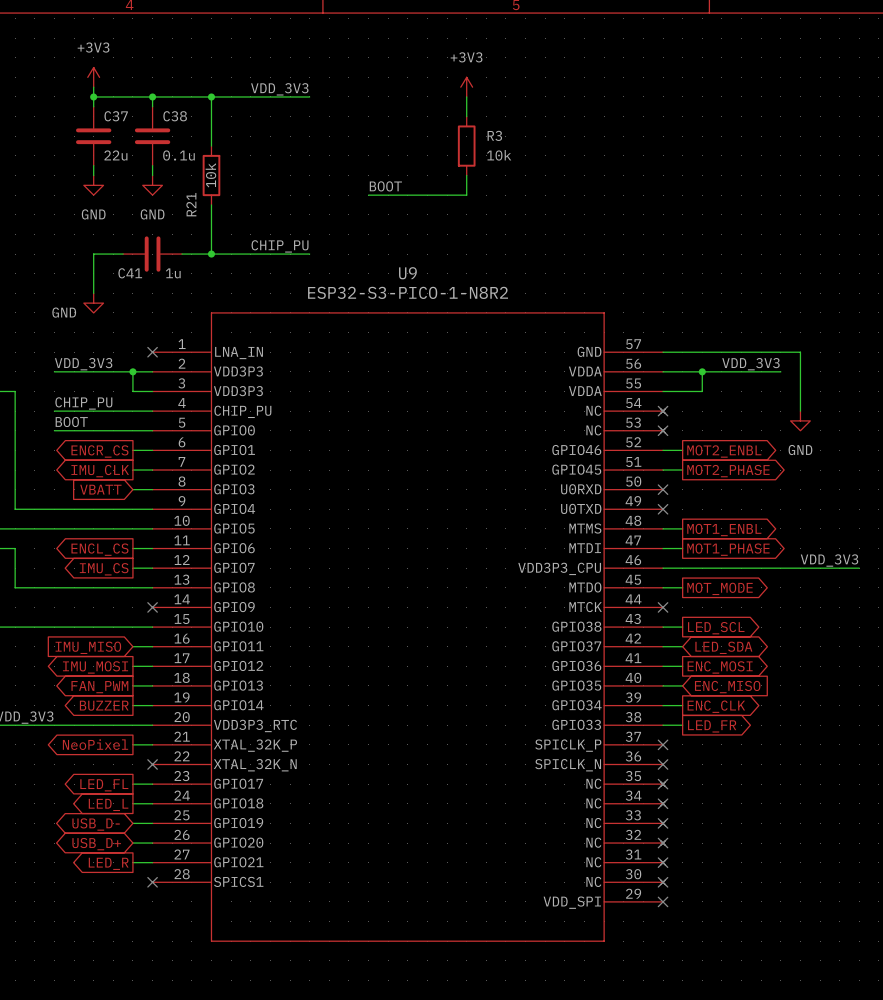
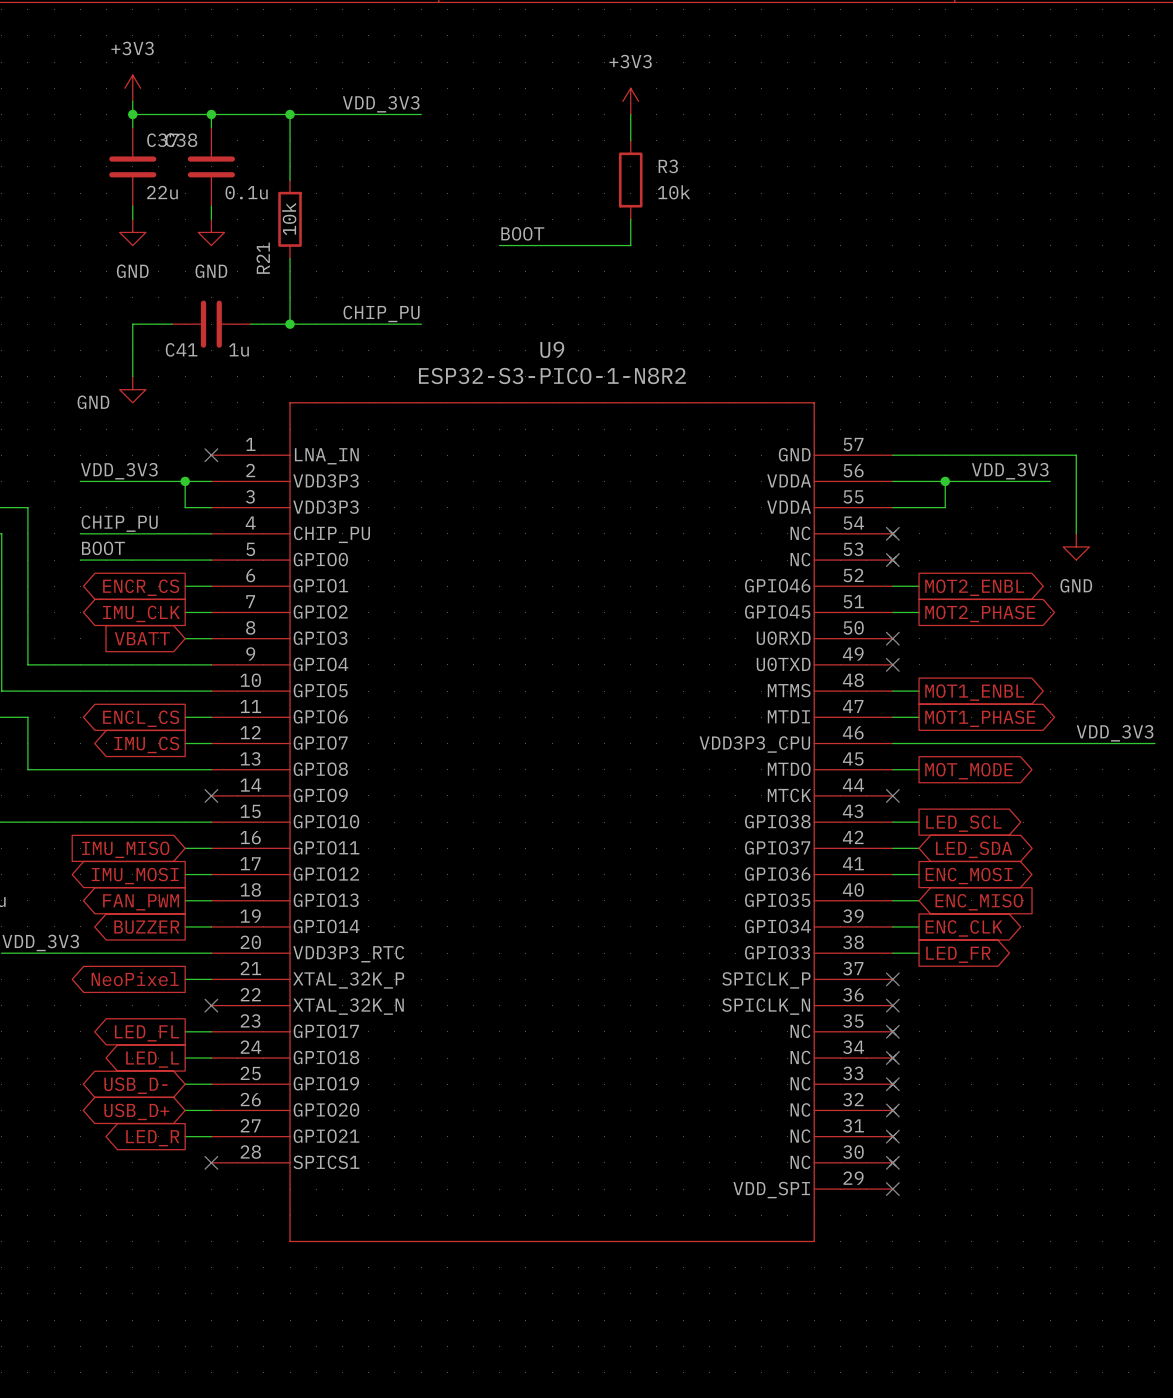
C38 name position: C38 (175, 116) -> C38 (181, 140)

